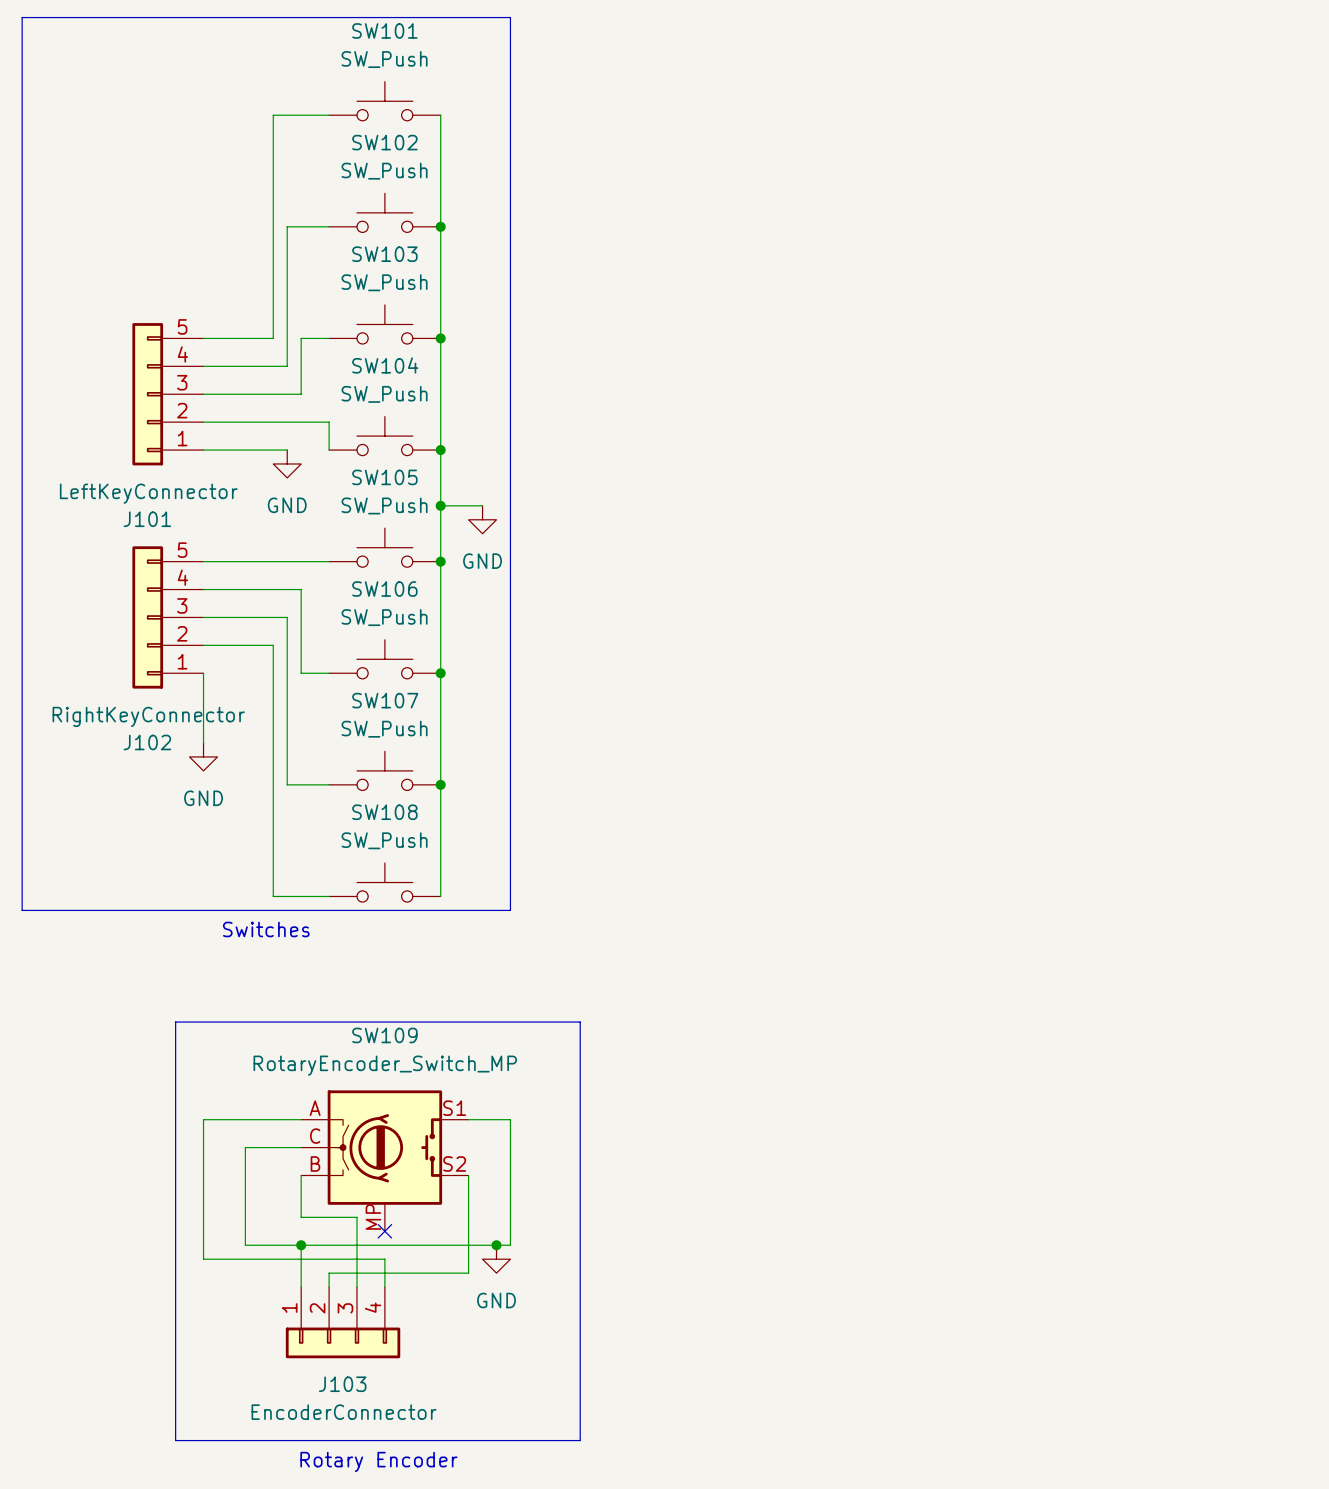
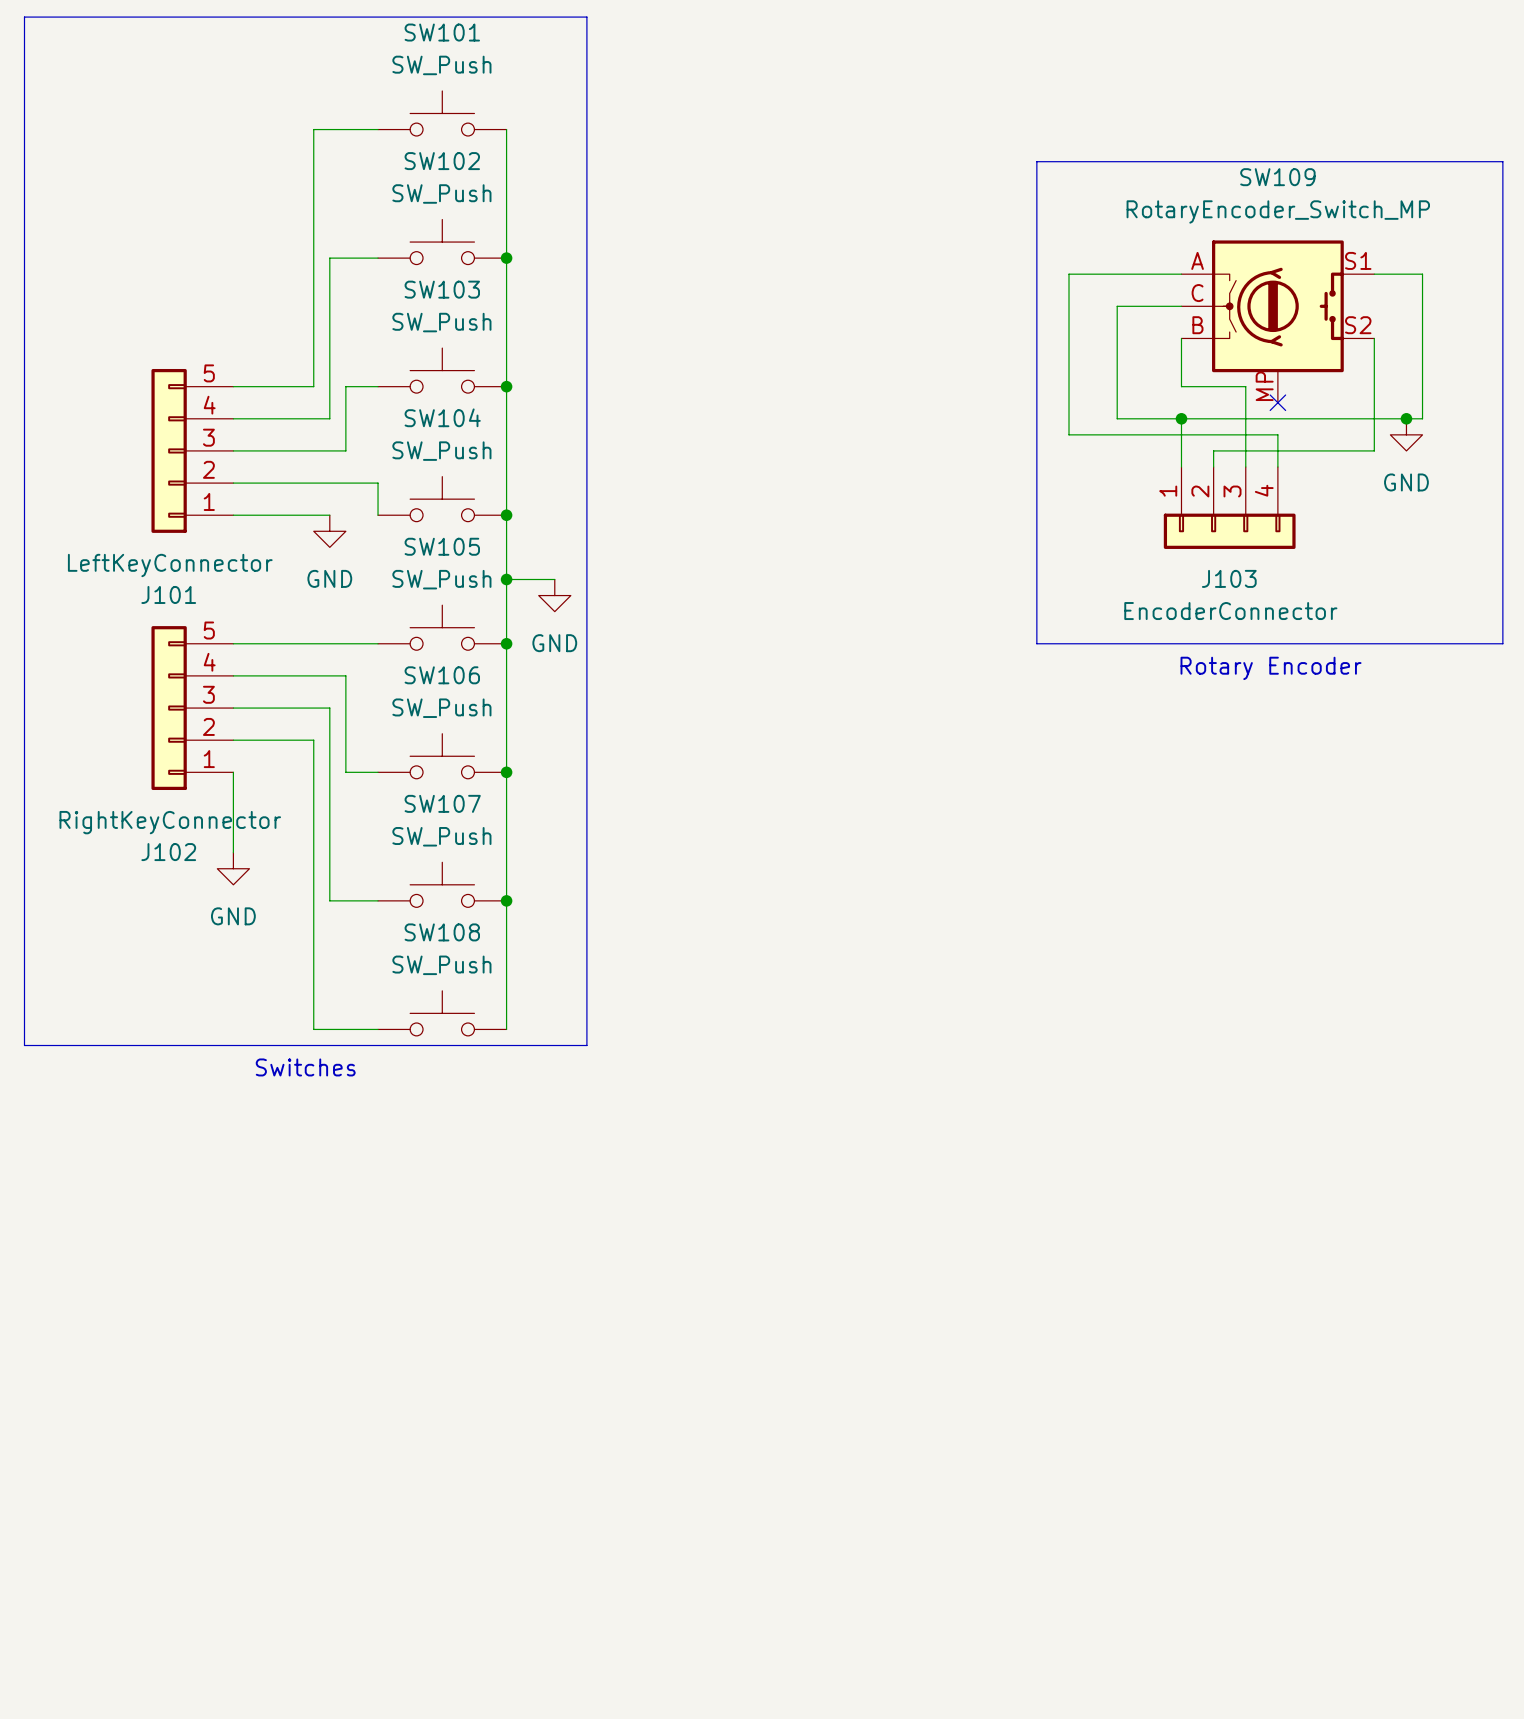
line: none -> (1036, 161) (1502, 161) (1502, 643) (1036, 643) (1036, 161)
wire: none -> (1181, 274) (1069, 274) (1069, 434) (1277, 434) (1277, 467)
wire: none -> (1374, 274) (1422, 274) (1422, 418) (1117, 418) (1117, 306) (1181, 306)
wire: none -> (1181, 338) (1181, 386) (1245, 386) (1245, 467)
wire: none -> (1374, 338) (1374, 450) (1213, 450) (1213, 467)
no-connect mark: none -> (1277, 402)
wire: none -> (1181, 418) (1181, 467)
junction: none -> (1181, 418)
junction: none -> (1406, 418)
power symbol: none -> GND (1406, 434)
text: none -> Rotary Encoder (1271, 668)
line: (175, 1022) (580, 1022) (580, 1440) (175, 1440) (175, 1022) -> none
wire: (301, 1119) (203, 1119) (203, 1259) (384, 1259) (384, 1287) -> none
wire: (468, 1119) (510, 1119) (510, 1245) (245, 1245) (245, 1147) (301, 1147) -> none
SW109 position: (384, 1160) -> (1277, 321)
wire: (301, 1175) (301, 1217) (356, 1217) (356, 1287) -> none
wire: (468, 1175) (468, 1273) (329, 1273) (329, 1287) -> none
no-connect mark: (384, 1231) -> none
wire: (301, 1245) (301, 1287) -> none
junction: (301, 1245) -> none
junction: (496, 1245) -> none
power symbol: GND (496, 1259) -> none
J103 position: (343, 1322) -> (1229, 507)
text: Rotary Encoder (378, 1461) -> none

